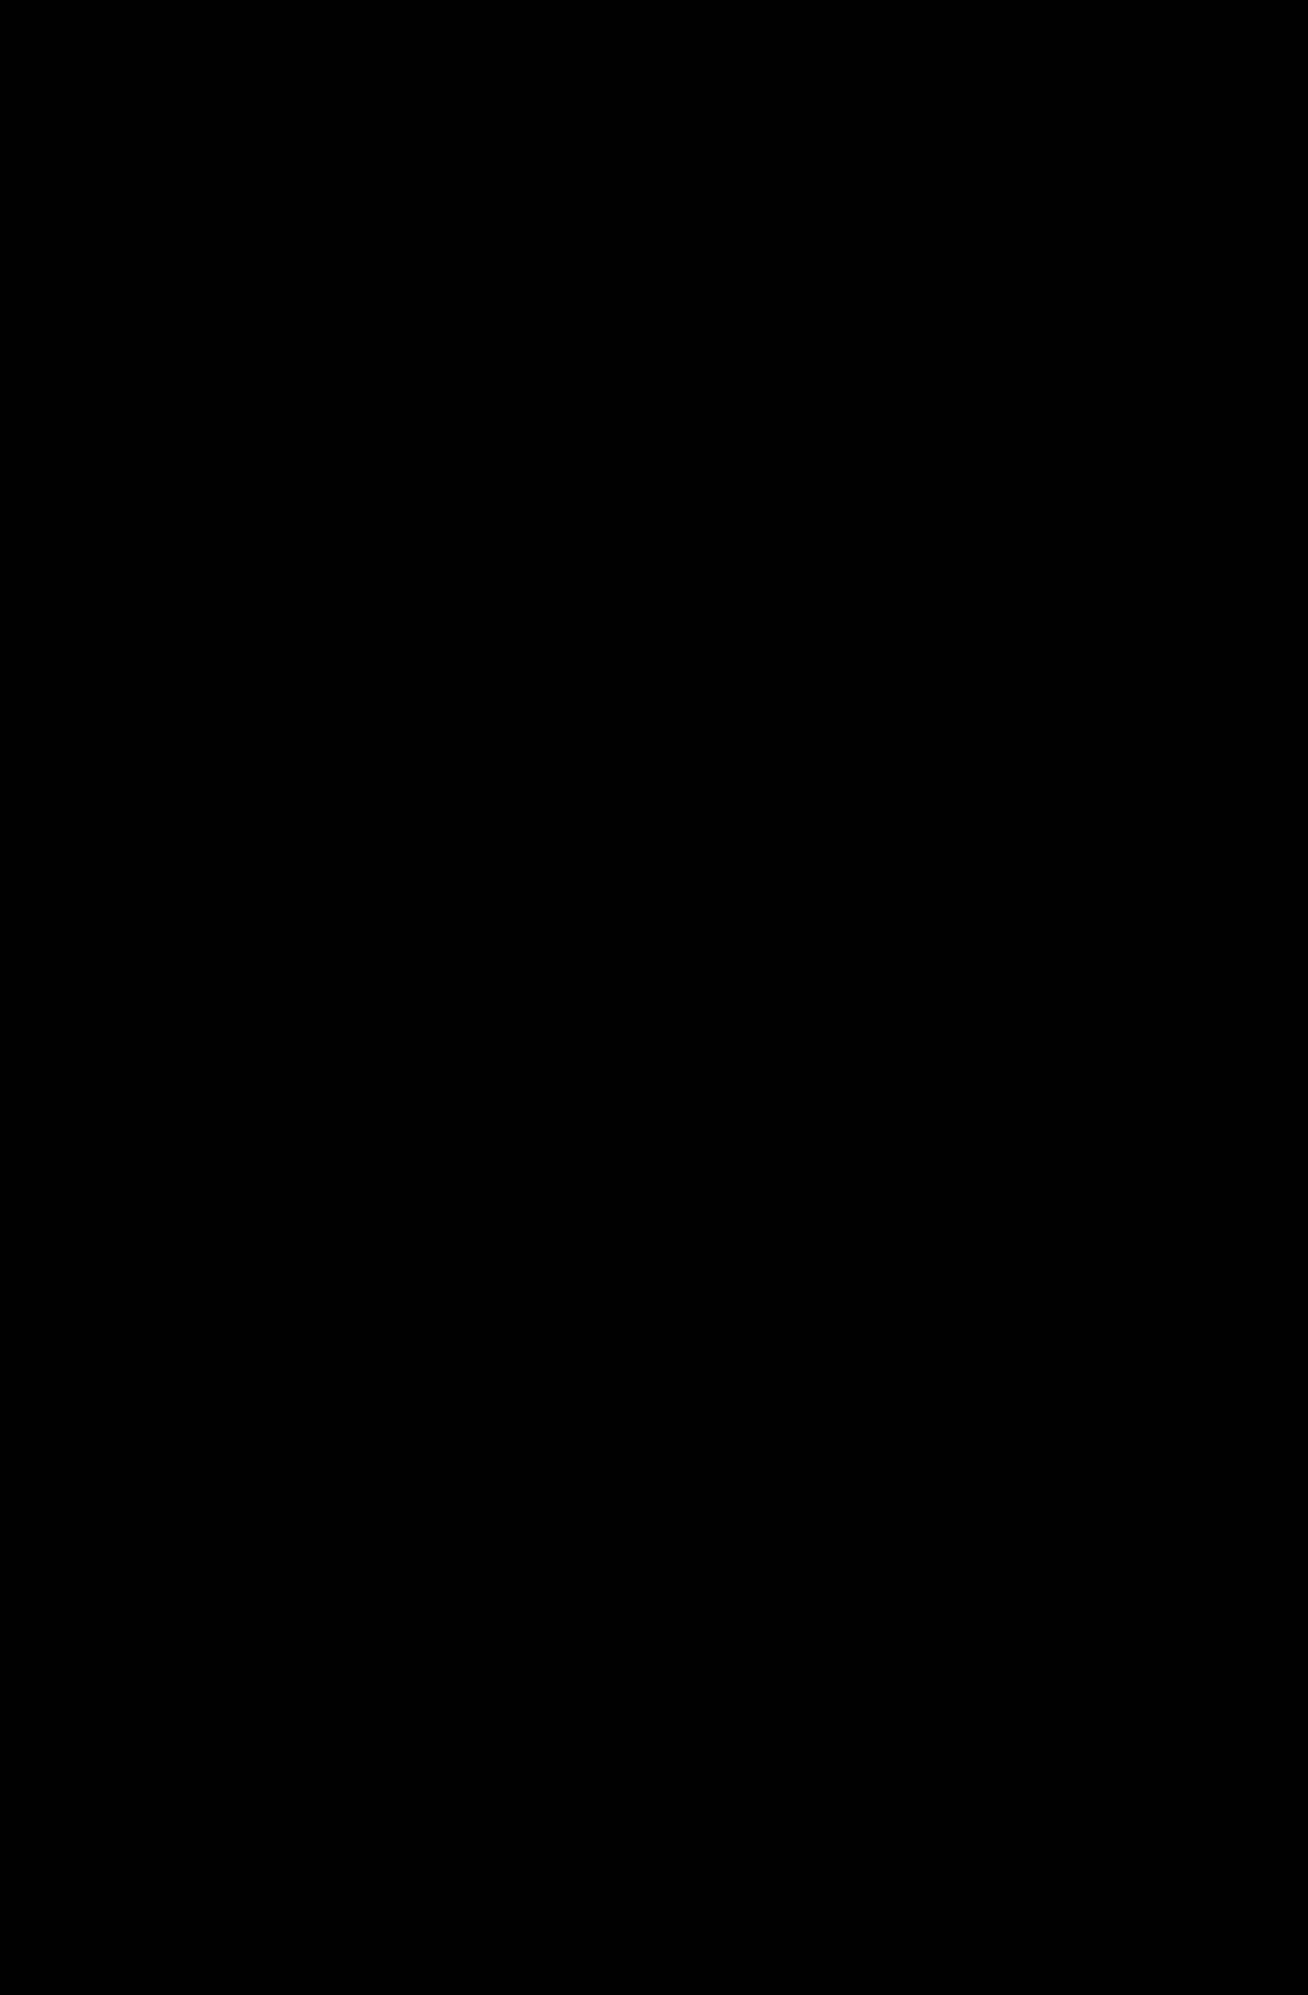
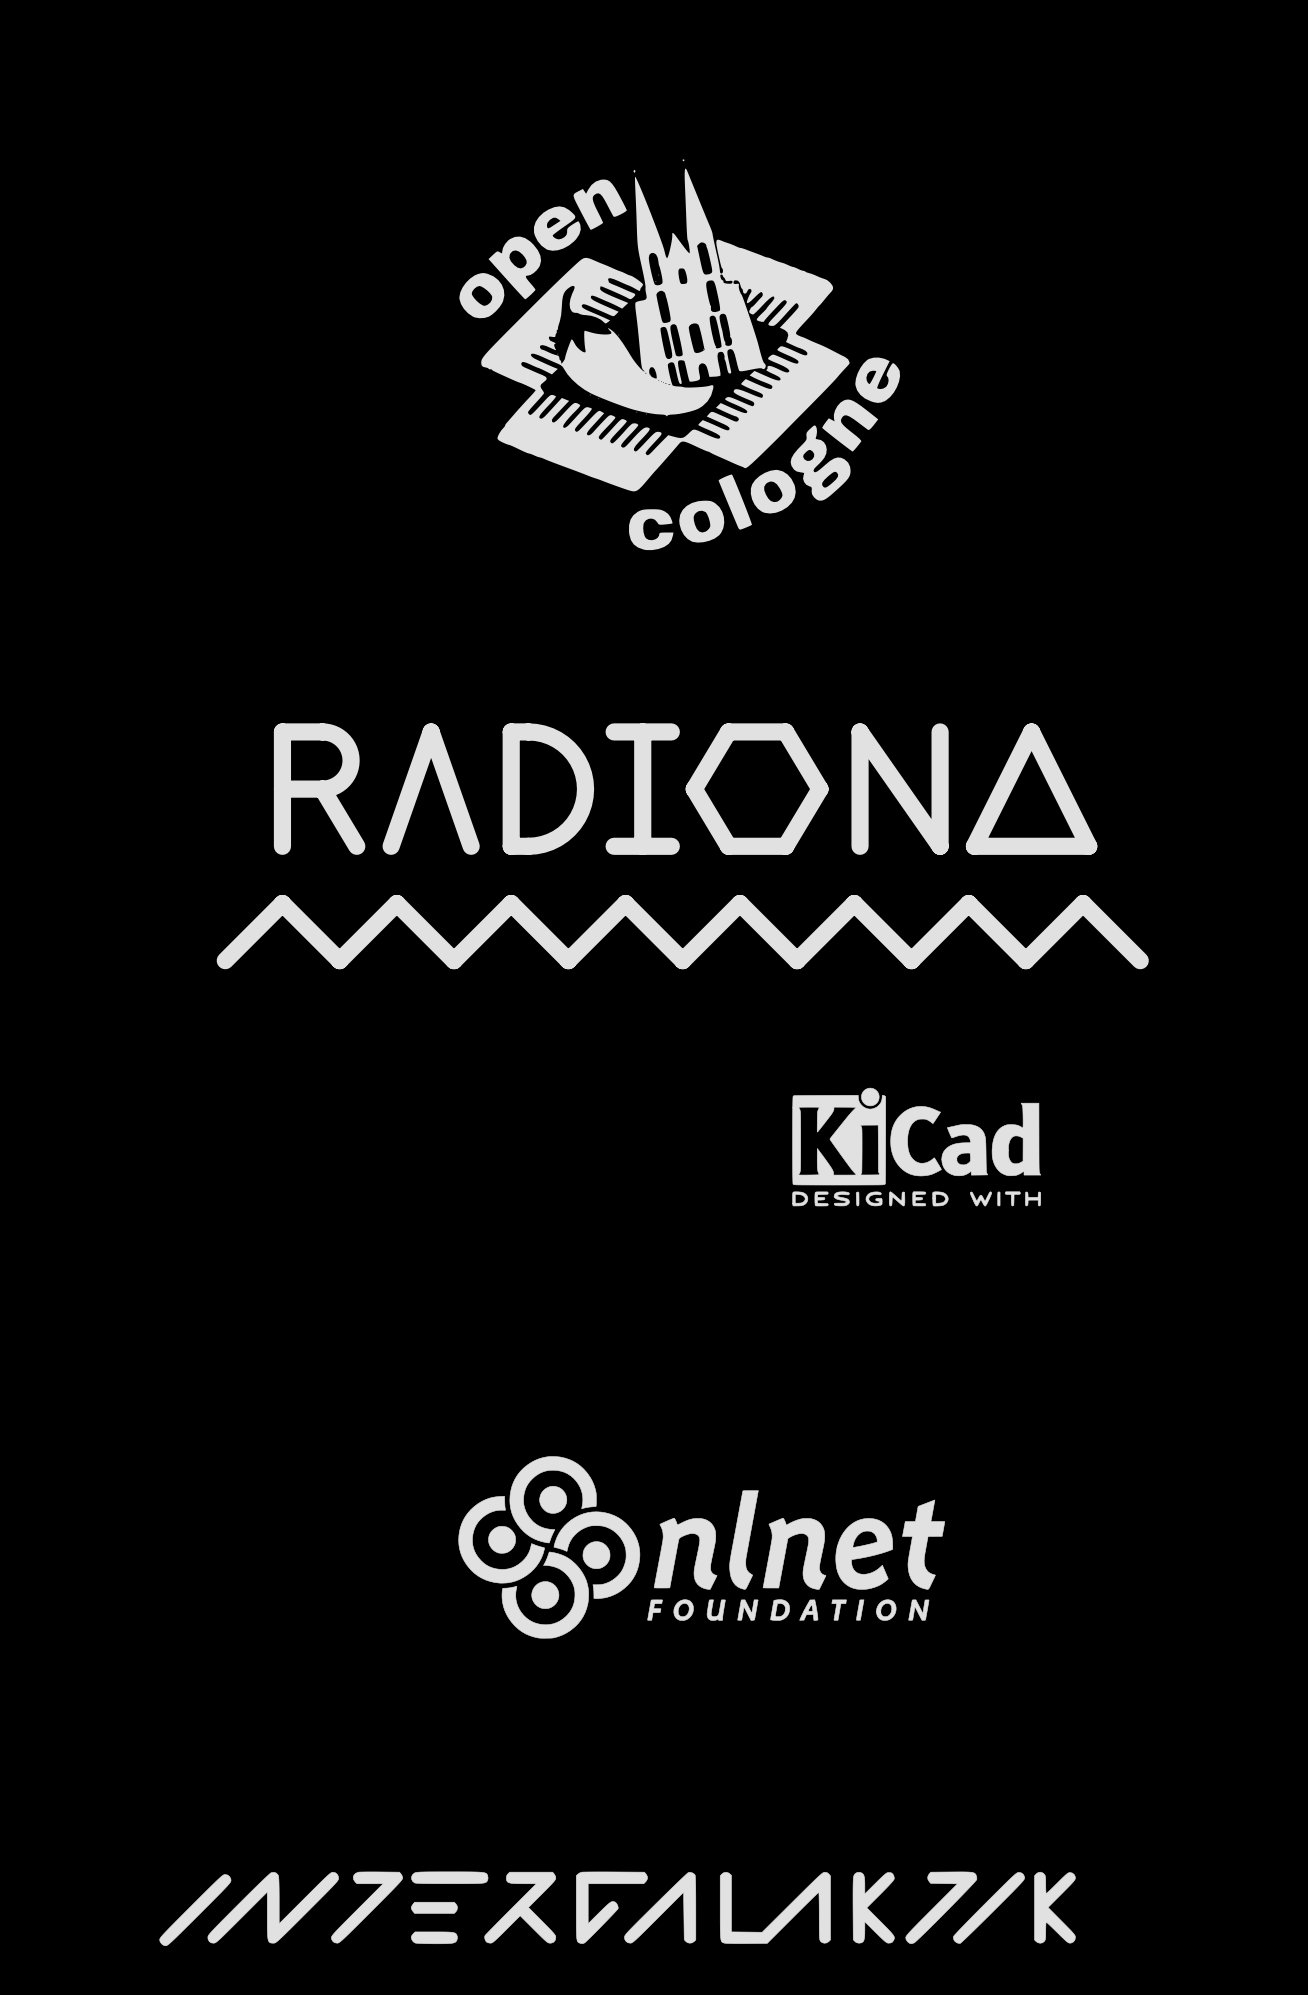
drawing: none -> [459, 159, 901, 551]
drawing: none -> [216, 723, 1149, 970]
drawing: none -> [792, 1087, 1042, 1207]
drawing: none -> [458, 1456, 945, 1639]
drawing: none -> [159, 1871, 1076, 1947]

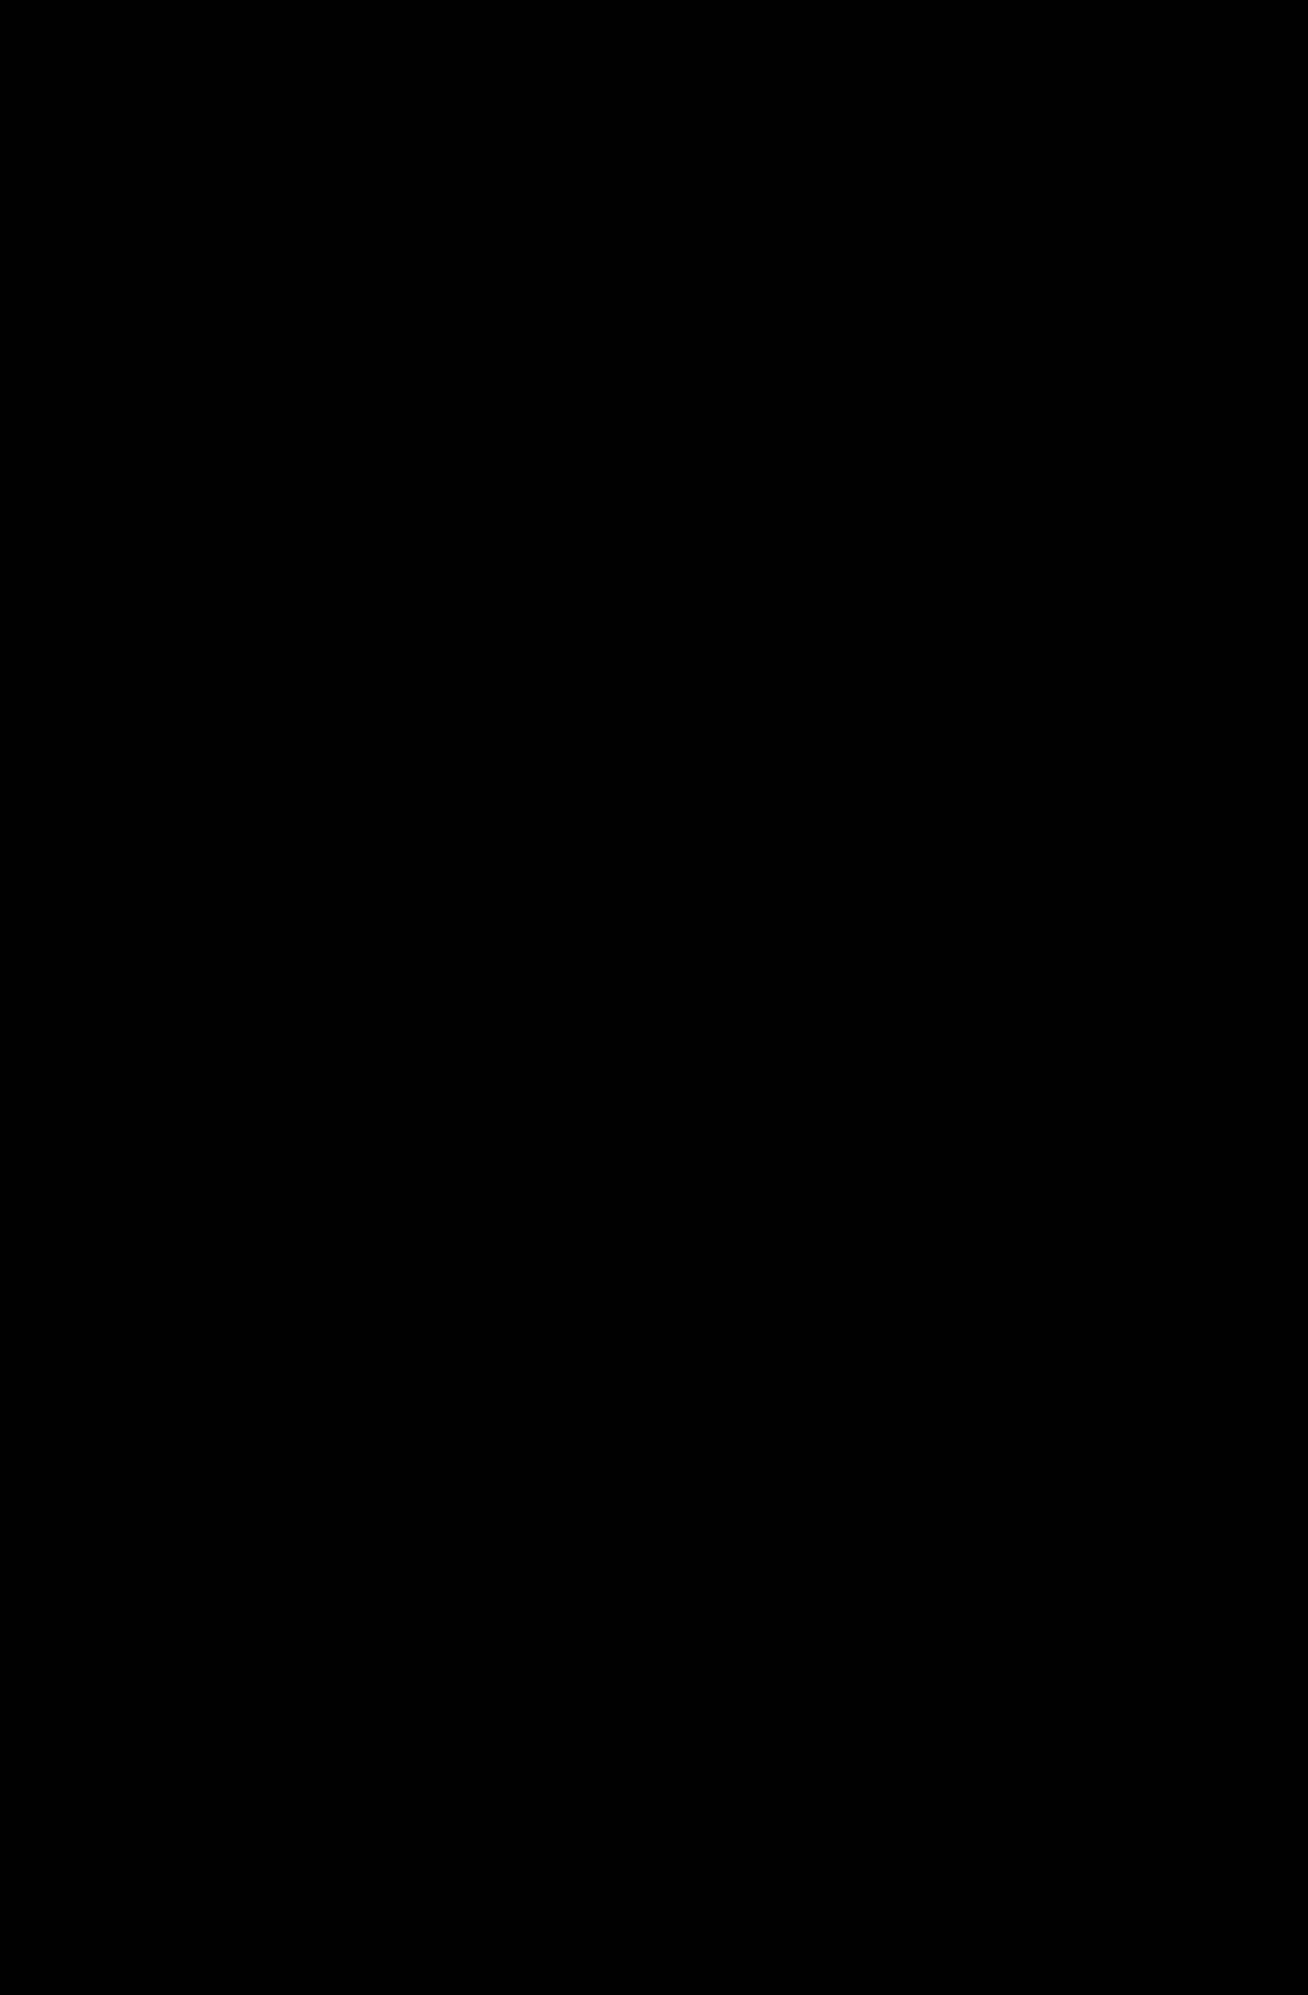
drawing: [459, 159, 901, 551] -> none
drawing: [216, 723, 1149, 970] -> none
drawing: [792, 1087, 1042, 1207] -> none
drawing: [458, 1456, 945, 1639] -> none
drawing: [159, 1871, 1076, 1947] -> none

